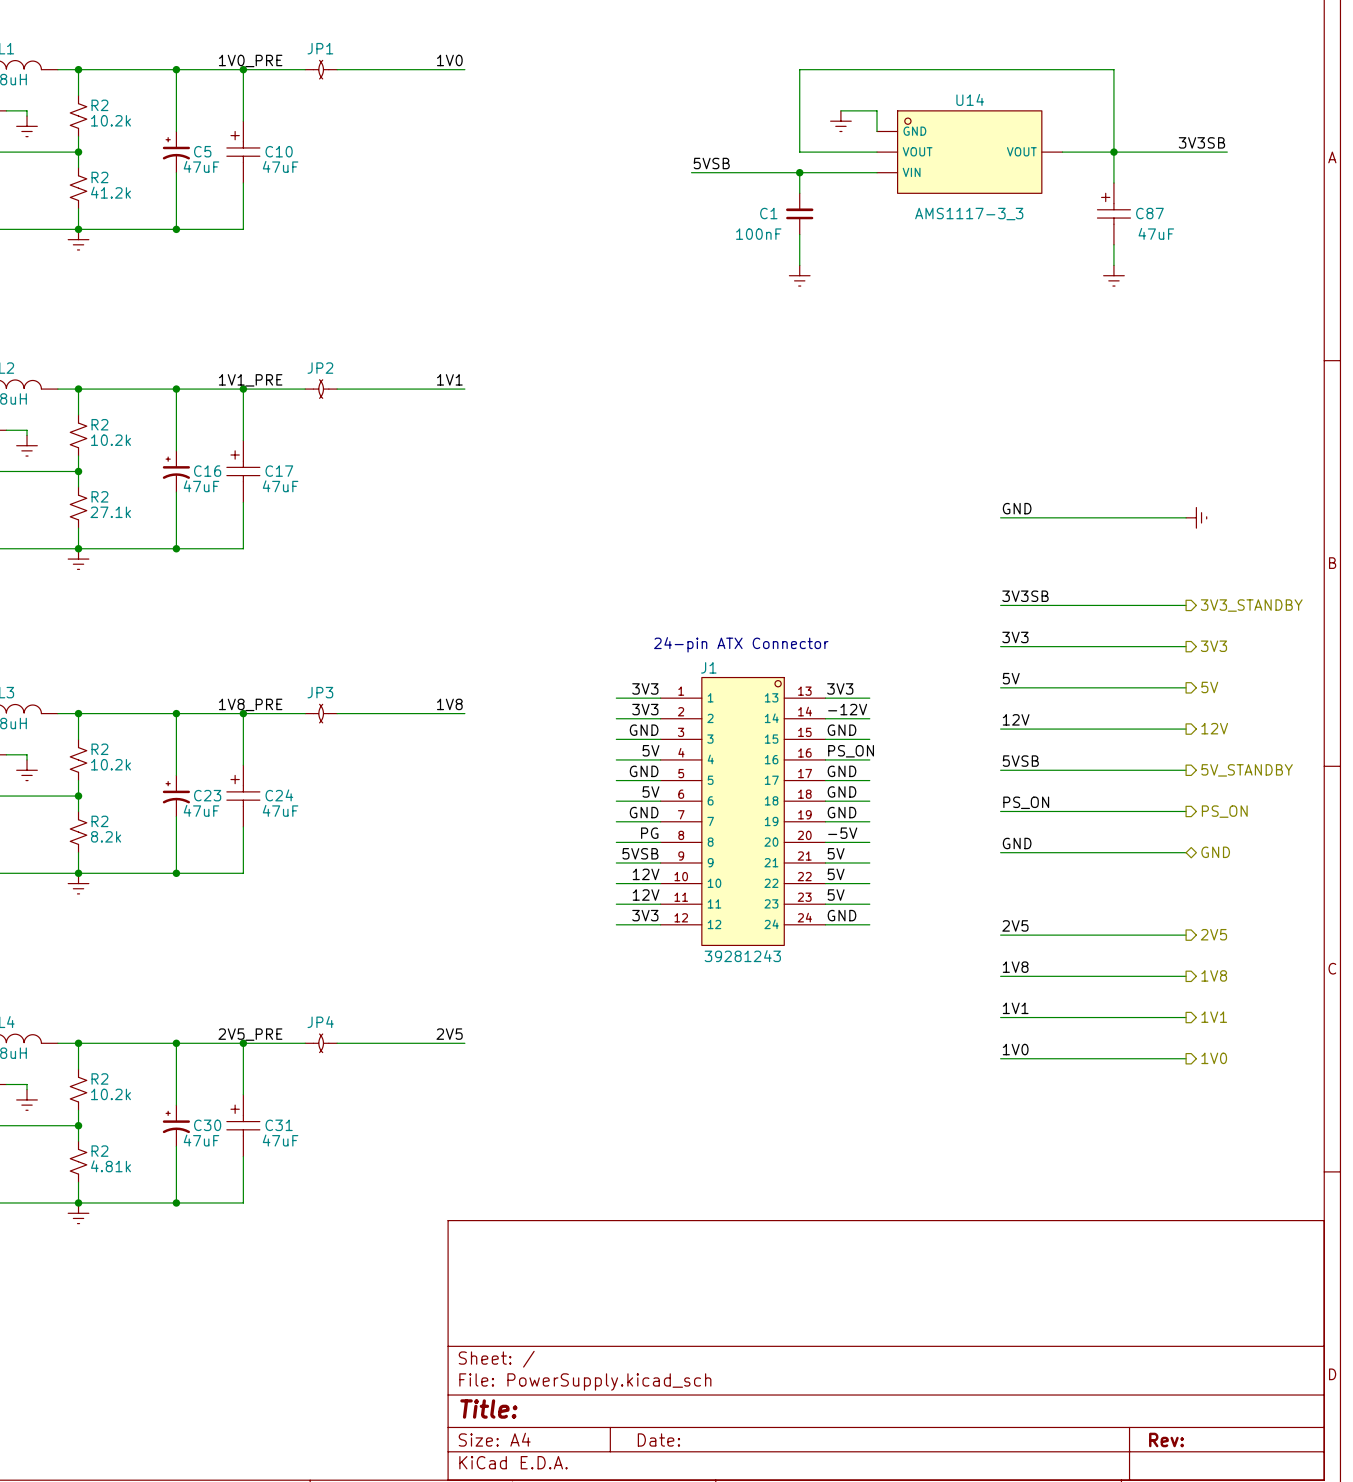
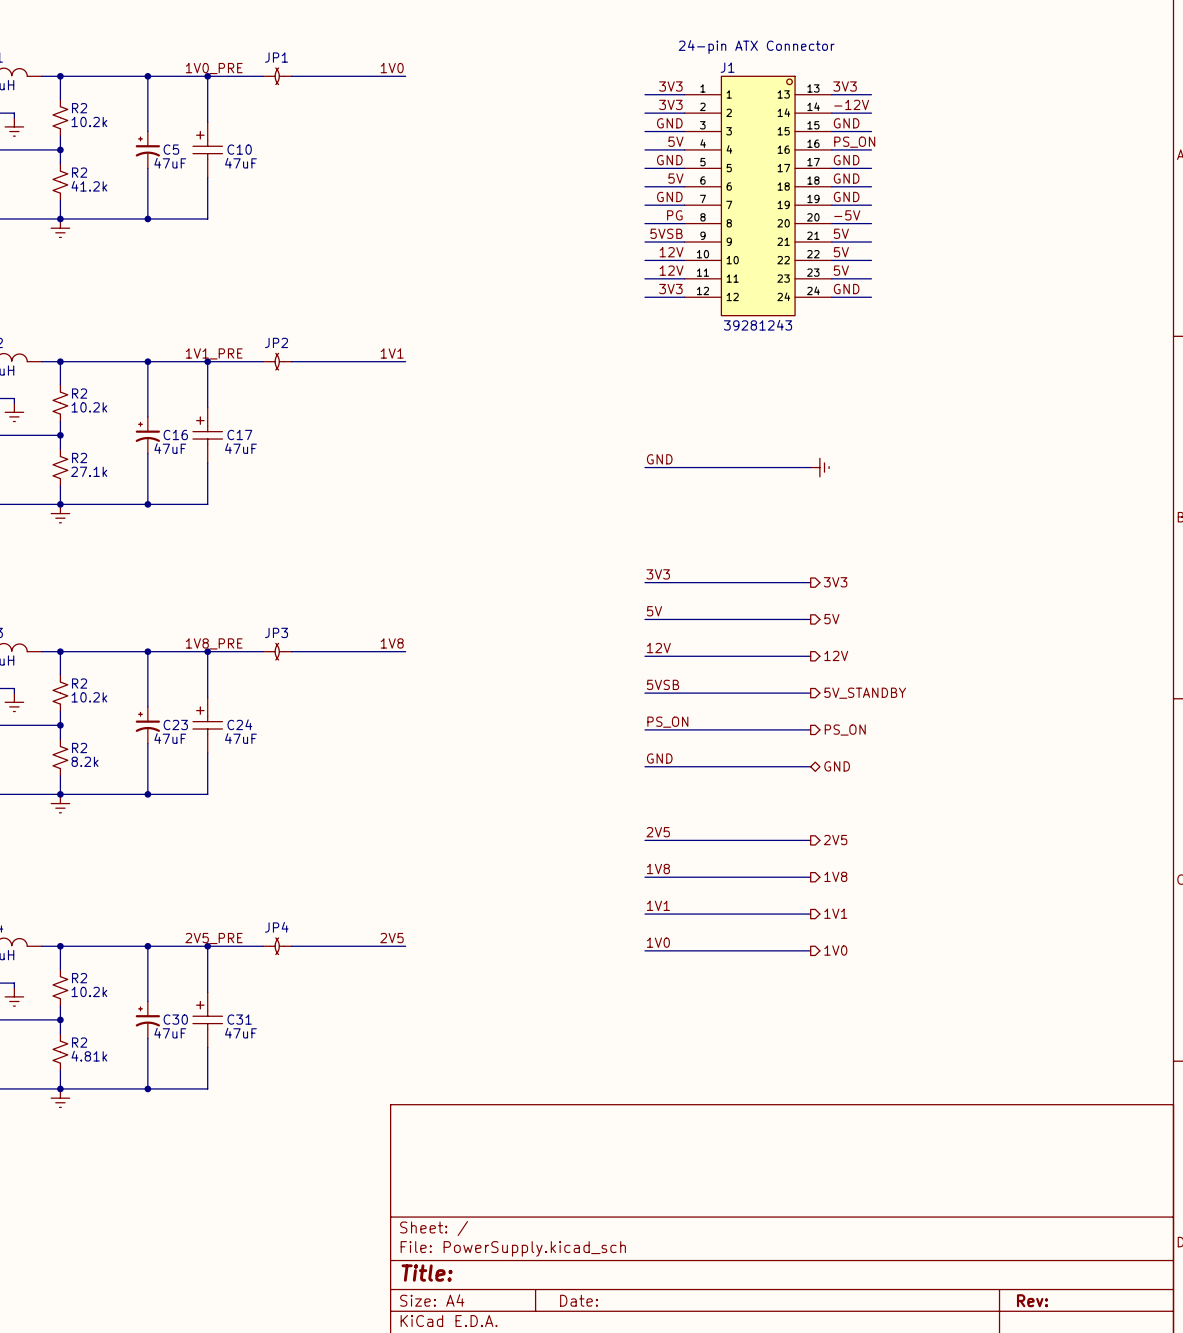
text: none -> 24-pin ATX Connector (756, 47)
label: none -> 3V3 (670, 86)
label: none -> 3V3 (845, 86)
wire: none -> (644, 94) (684, 94)
wire: none -> (831, 94) (871, 94)
label: none -> 3V3 (670, 104)
label: none -> -12V (851, 104)
wire: none -> (644, 113) (684, 113)
power symbol: (840, 121) -> none
label: none -> GND (669, 123)
label: none -> GND (846, 123)
wire: none -> (644, 131) (684, 131)
label: none -> 5V (675, 141)
label: 3V3SB (1201, 142) -> none
label: none -> PS_ON (854, 142)
wire: none -> (644, 149) (684, 149)
wire: (876, 152) (799, 152) (799, 69) (1113, 69) (1113, 183) -> none
U14: AMS1117-3_3 (969, 152) -> none
wire: (1062, 152) (1227, 152) -> none
junction: (1113, 152) -> none
label position: 5VSB (711, 163) -> 5VSB (666, 233)
label: none -> GND (669, 160)
label: none -> GND (846, 160)
wire: (691, 172) (732, 172) -> none
wire: (799, 172) (799, 193) -> none
junction: (799, 172) -> none
label: none -> 5V (675, 178)
label: none -> GND (846, 178)
wire: none -> (644, 186) (684, 186)
label: none -> GND (669, 196)
label: none -> GND (846, 196)
wire: none -> (644, 205) (684, 205)
C1: 100nF (799, 213) -> none
wire: none -> (831, 205) (871, 205)
C87: 47uF (1113, 213) -> none
label: none -> PG (674, 215)
label: none -> -5V (847, 215)
wire: none -> (644, 223) (684, 223)
wire: (799, 234) (799, 265) -> none
wire: none -> (831, 223) (871, 223)
wire: (1113, 244) (1113, 265) -> none
label: none -> 5V (841, 233)
wire: none -> (644, 242) (684, 242)
wire: none -> (831, 242) (871, 242)
label: none -> 12V (671, 252)
label: none -> 5V (841, 252)
wire: none -> (644, 260) (684, 260)
power symbol: (799, 275) -> none
wire: none -> (831, 260) (871, 260)
power symbol: (1113, 275) -> none
label: none -> 12V (671, 270)
label: none -> 5V (841, 270)
wire: none -> (644, 278) (684, 278)
wire: none -> (831, 278) (871, 278)
label: none -> 3V3 (670, 289)
label: none -> GND (846, 289)
wire: none -> (644, 297) (684, 297)
wire: none -> (831, 297) (871, 297)
label: none -> GND (659, 459)
wire: none -> (644, 467) (810, 467)
power symbol: none -> (819, 467)
label: GND (1017, 508) -> none
wire: (1000, 517) (1186, 517) -> none
power symbol: (1196, 517) -> none
label: 3V3SB (1025, 596) -> none
wire: (1000, 605) (1186, 605) -> none
hierarchical label: 3V3_STANDBY (1251, 605) -> none
label: none -> 3V3 (658, 574)
hierarchical label: none -> 3V3 (835, 582)
wire: none -> (644, 582) (810, 582)
label: 3V3 (1015, 637) -> none
text: 24-pin ATX Connector (741, 644) -> none
wire: (1000, 646) (1186, 646) -> none
hierarchical label: 3V3 (1213, 646) -> none
label: none -> 5V (654, 611)
wire: none -> (644, 619) (810, 619)
hierarchical label: none -> 5V (831, 619)
label: 5V (1011, 678) -> none
wire: (1000, 687) (1186, 687) -> none
hierarchical label: 5V (1209, 687) -> none
label: 3V3 (645, 688) -> none
label: 3V3 (840, 688) -> none
wire: (616, 698) (660, 698) -> none
wire: (825, 698) (869, 698) -> none
label: 3V3 (645, 709) -> none
label: none -> 12V (658, 648)
label: -12V (847, 709) -> none
wire: (616, 718) (660, 718) -> none
wire: none -> (767, 656) (810, 656)
hierarchical label: none -> 12V (836, 655)
label: 12V (1016, 719) -> none
hierarchical label: 12V (1214, 728) -> none
wire: (1000, 729) (1186, 729) -> none
label: GND (644, 730) -> none
label: GND (841, 730) -> none
wire: (616, 739) (660, 739) -> none
wire: (825, 739) (869, 739) -> none
label: 5V (650, 750) -> none
label position: PS_ON (851, 751) -> PS_ON (667, 722)
wire: (616, 759) (660, 759) -> none
wire: none -> (767, 693) (810, 693)
hierarchical label: none -> 5V_STANDBY (865, 693)
label: 5VSB (1020, 761) -> none
wire: (1000, 770) (1186, 770) -> none
hierarchical label: 5V_STANDBY (1247, 770) -> none
label: GND (644, 771) -> none
label: GND (841, 771) -> none
wire: (616, 780) (660, 780) -> none
wire: (825, 780) (869, 780) -> none
label: 5V (650, 791) -> none
label: GND (841, 791) -> none
wire: (616, 801) (660, 801) -> none
wire: none -> (767, 729) (810, 729)
hierarchical label: none -> PS_ON (845, 730)
label: PS_ON (1026, 802) -> none
J1 position: (743, 811) -> (758, 195)
wire: (1000, 811) (1186, 811) -> none
hierarchical label: PS_ON (1224, 811) -> none
label: GND (644, 812) -> none
label: GND (841, 812) -> none
wire: (616, 821) (660, 821) -> none
wire: (825, 821) (869, 821) -> none
label: PG (649, 833) -> none
label: none -> GND (659, 758)
label: -5V (842, 833) -> none
wire: (616, 842) (660, 842) -> none
wire: none -> (767, 766) (810, 766)
hierarchical label: none -> GND (837, 766)
label: GND (1017, 843) -> none
wire: (1000, 852) (1186, 852) -> none
hierarchical label: GND (1215, 852) -> none
label position: 5VSB (640, 853) -> 5VSB (663, 684)
label: 5V (836, 853) -> none
wire: (616, 862) (660, 862) -> none
wire: (825, 862) (869, 862) -> none
label: 12V (646, 874) -> none
label: 5V (836, 874) -> none
wire: (616, 883) (660, 883) -> none
wire: (825, 883) (869, 883) -> none
label: 12V (646, 895) -> none
label: 5V (836, 895) -> none
wire: (616, 904) (660, 904) -> none
wire: (825, 904) (869, 904) -> none
label: 3V3 (645, 915) -> none
label: none -> 2V5 (658, 832)
label: GND (841, 915) -> none
wire: (616, 924) (660, 924) -> none
wire: none -> (767, 840) (810, 840)
hierarchical label: none -> 2V5 (835, 840)
label: 2V5 (1015, 925) -> none
hierarchical label: 2V5 (1213, 934) -> none
wire: (1000, 935) (1186, 935) -> none
label: none -> 1V8 (658, 869)
hierarchical label: none -> 1V8 (835, 876)
wire: none -> (644, 877) (810, 877)
label: 1V8 (1015, 967) -> none
hierarchical label: 1V8 (1214, 975) -> none
wire: (1000, 976) (1186, 976) -> none
label: none -> 1V1 (658, 905)
hierarchical label: none -> 1V1 (835, 913)
wire: none -> (644, 914) (810, 914)
label: 1V1 (1015, 1008) -> none
wire: (1000, 1017) (1186, 1017) -> none
hierarchical label: 1V1 (1214, 1017) -> none
label: none -> 1V0 (658, 942)
wire: none -> (644, 950) (810, 950)
hierarchical label: none -> 1V0 (835, 950)
label: 1V0 (1015, 1049) -> none
wire: (1000, 1058) (1186, 1058) -> none
hierarchical label: 1V0 (1214, 1058) -> none

